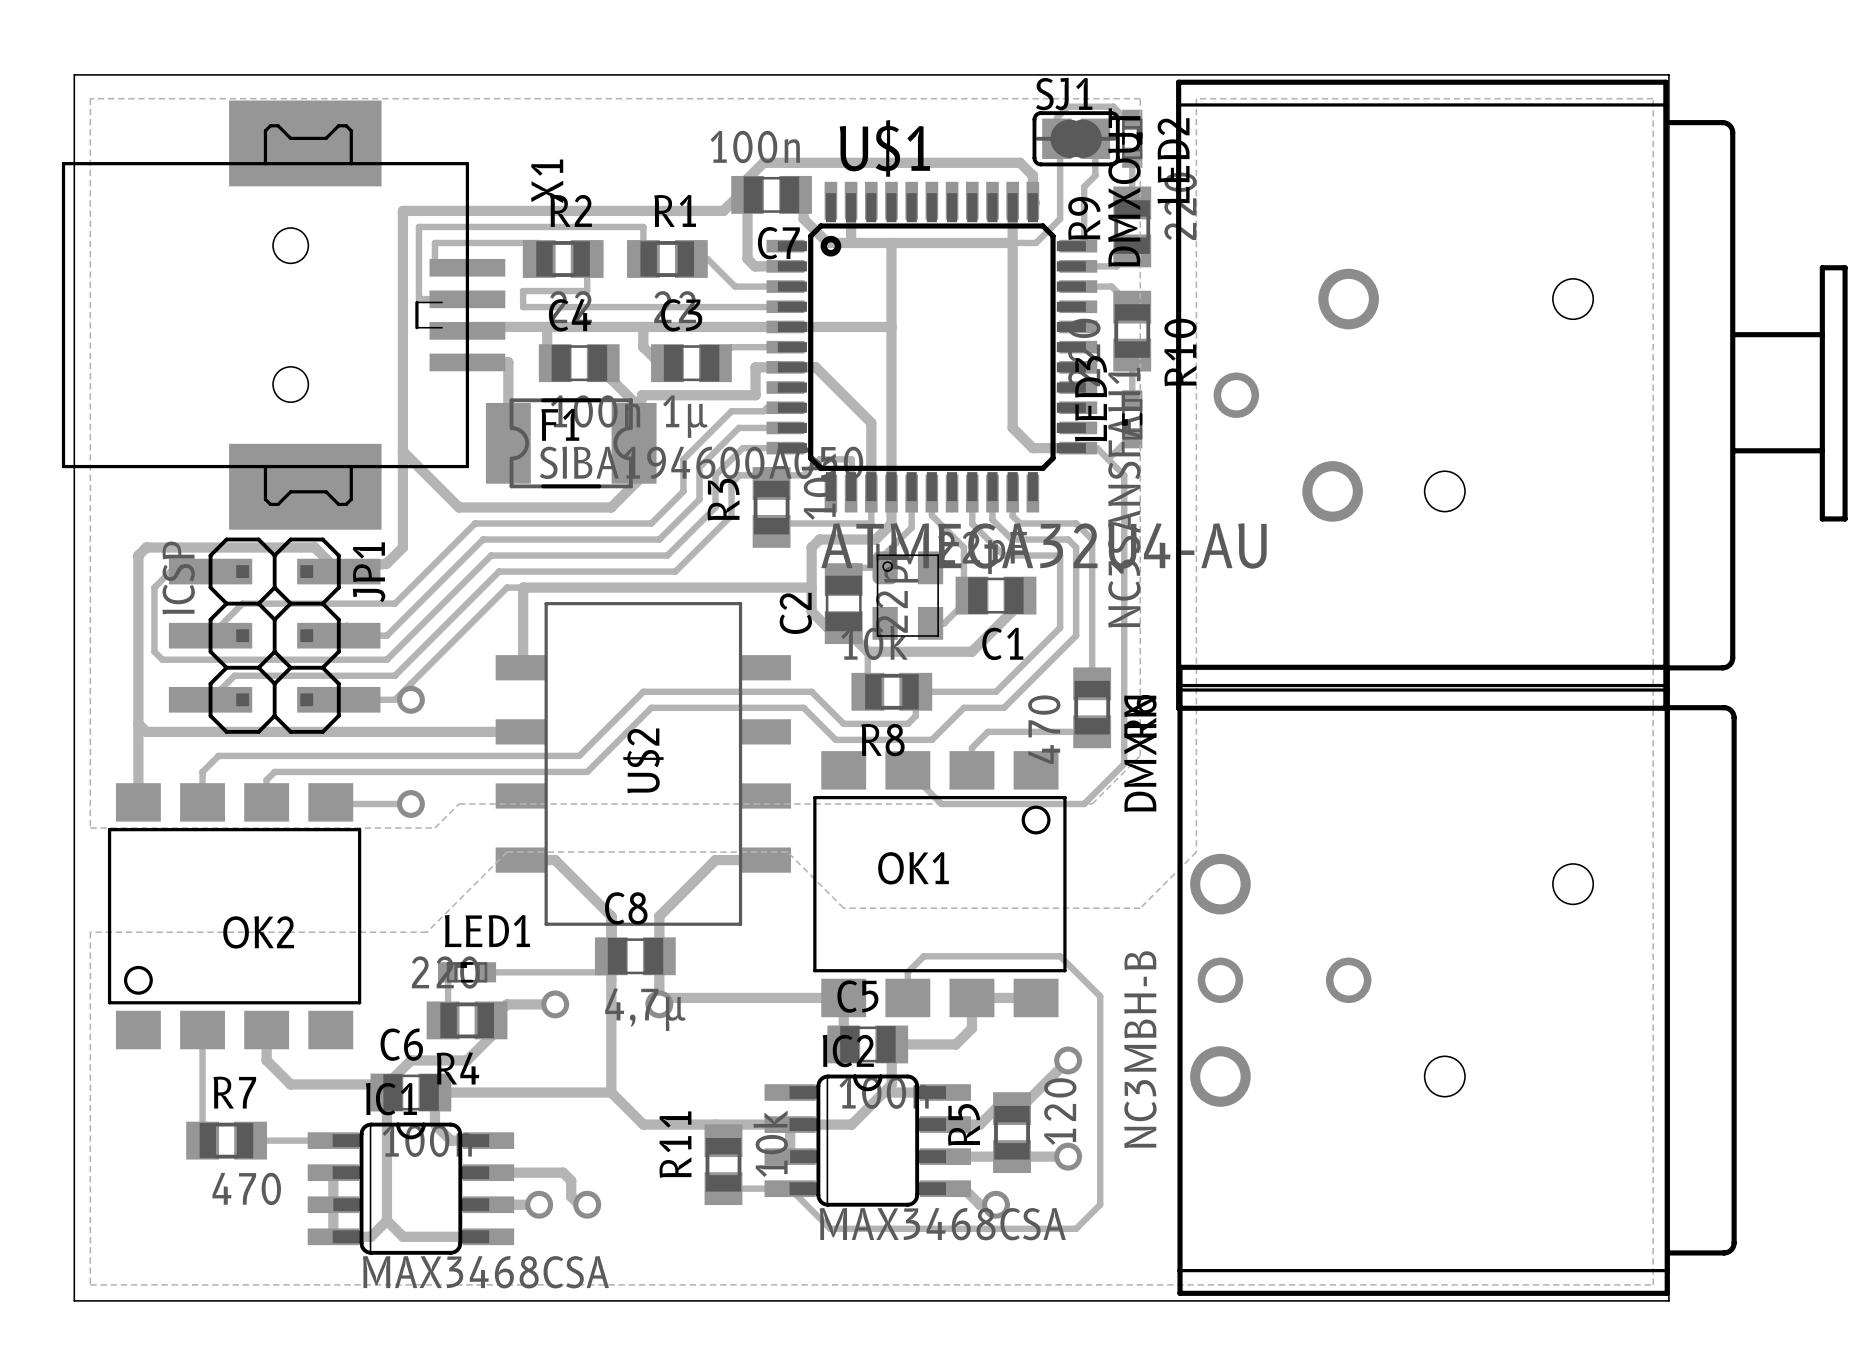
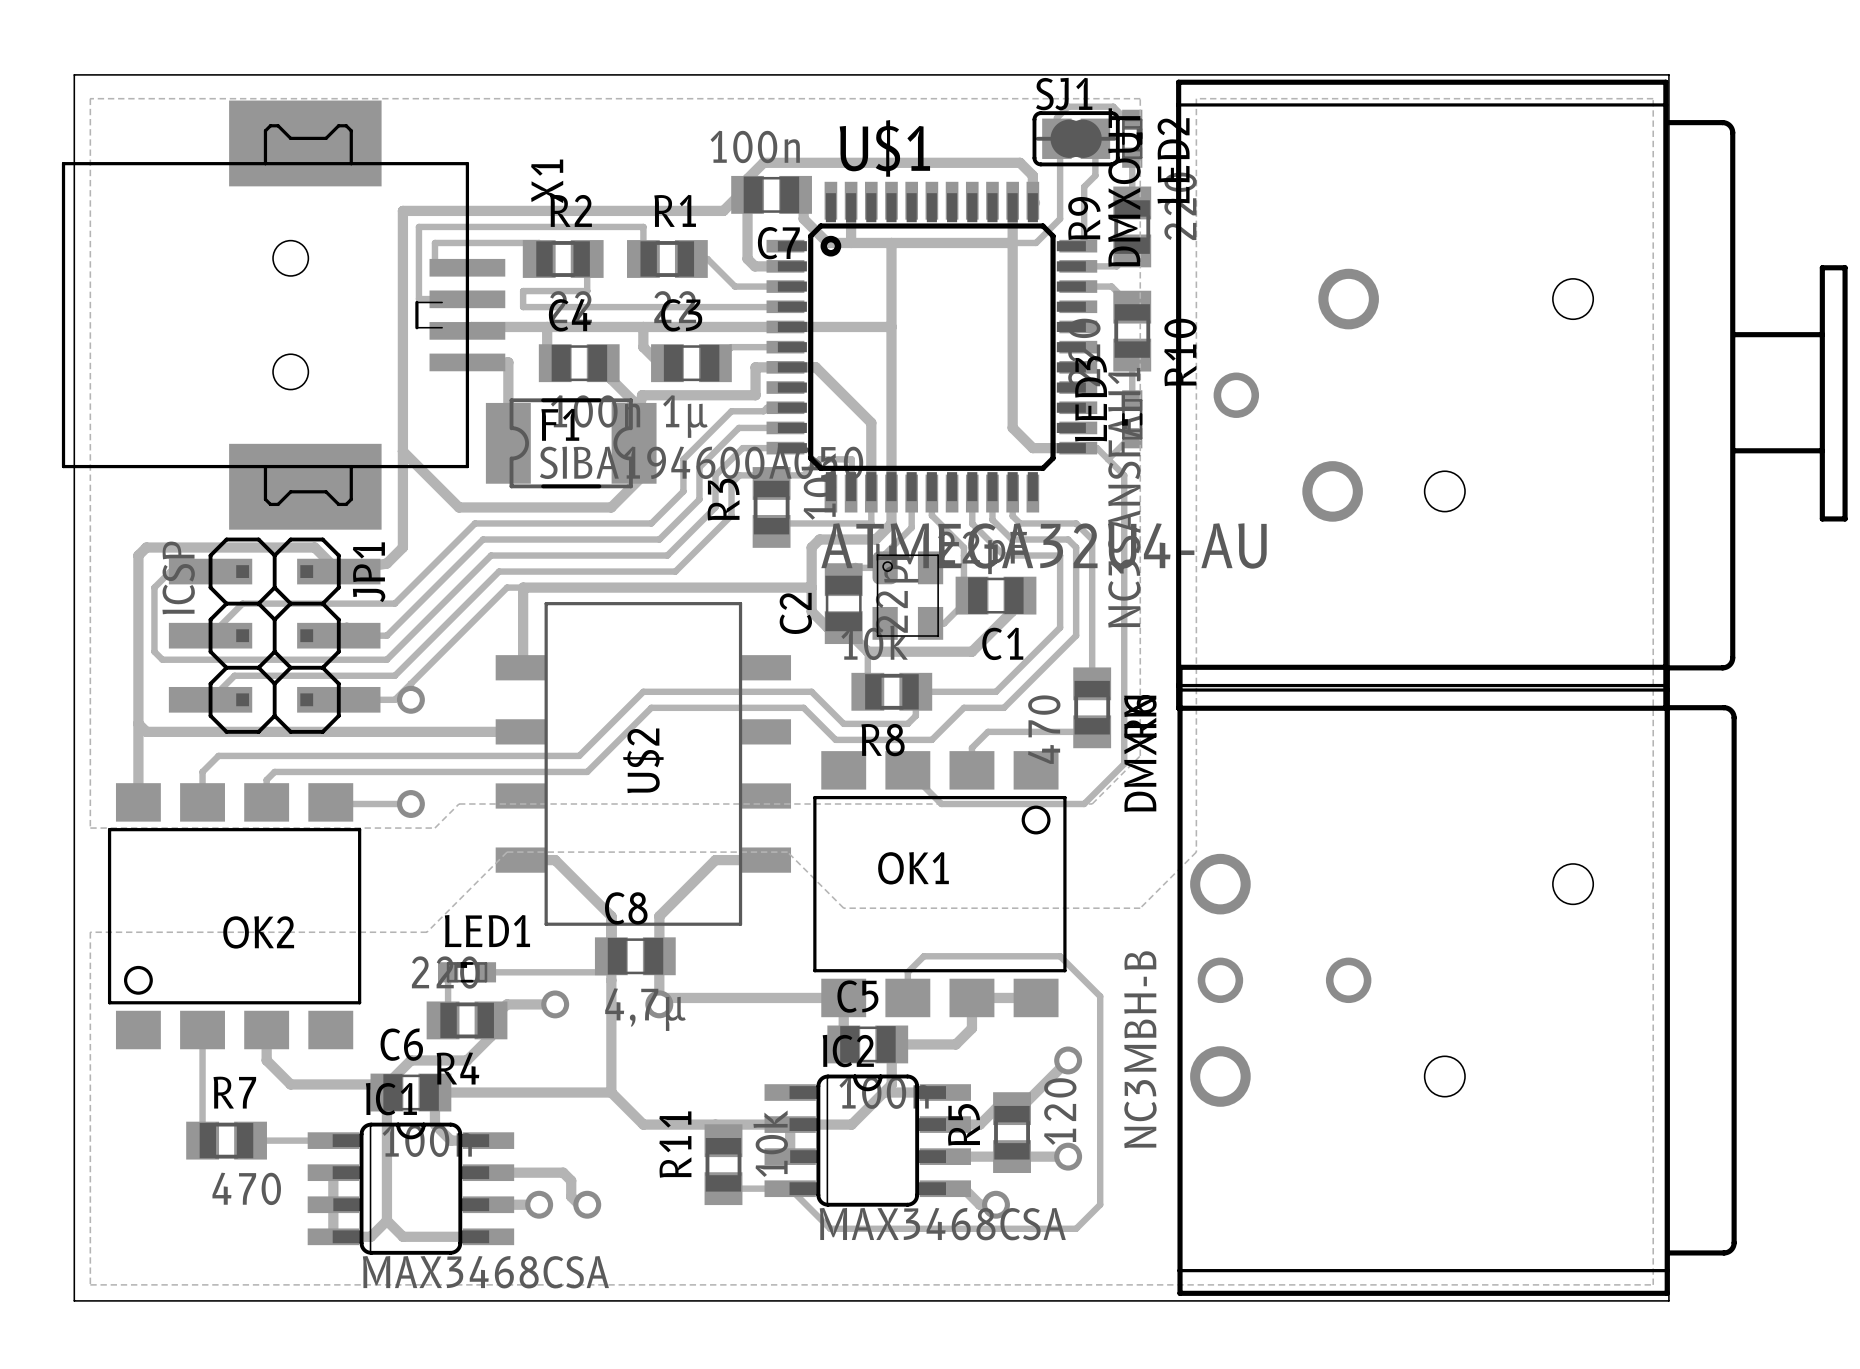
X1 footprint: [61, 100, 506, 530] -> [61, 100, 506, 530]

